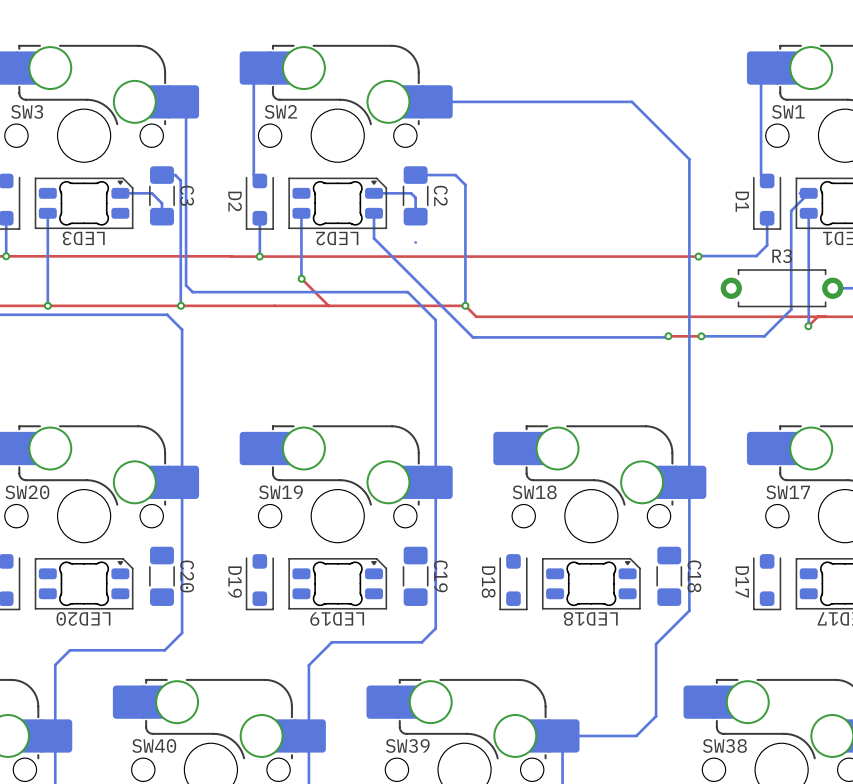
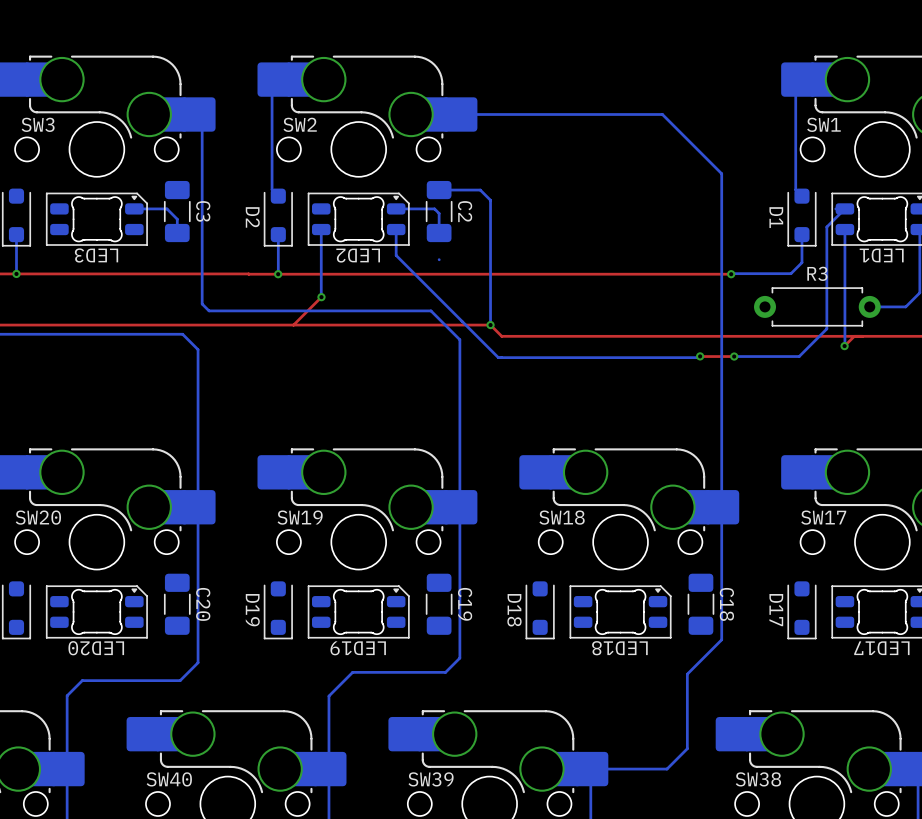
bottom track: (161, 175) (175, 175) (180, 180) (181, 305) -> none
bottom track: (47, 213) (47, 305) -> none
top track: (301, 278) (328, 305) -> (321, 297) (293, 325)
via: (47, 305) -> none
via: (181, 305) -> none

